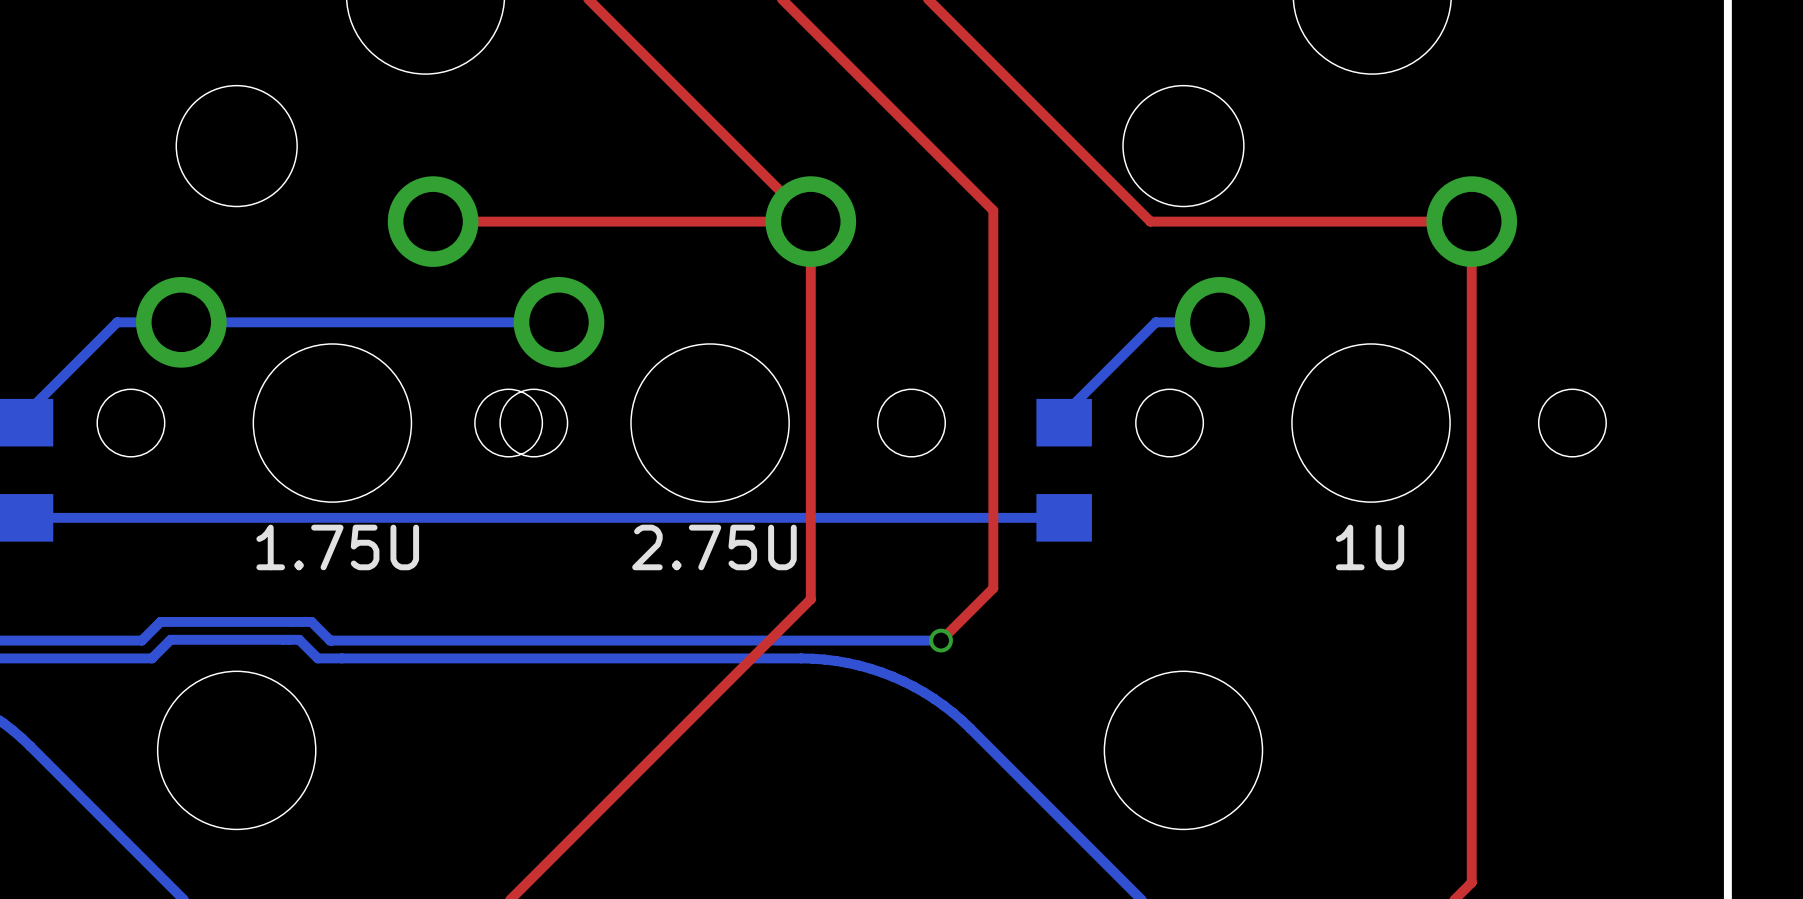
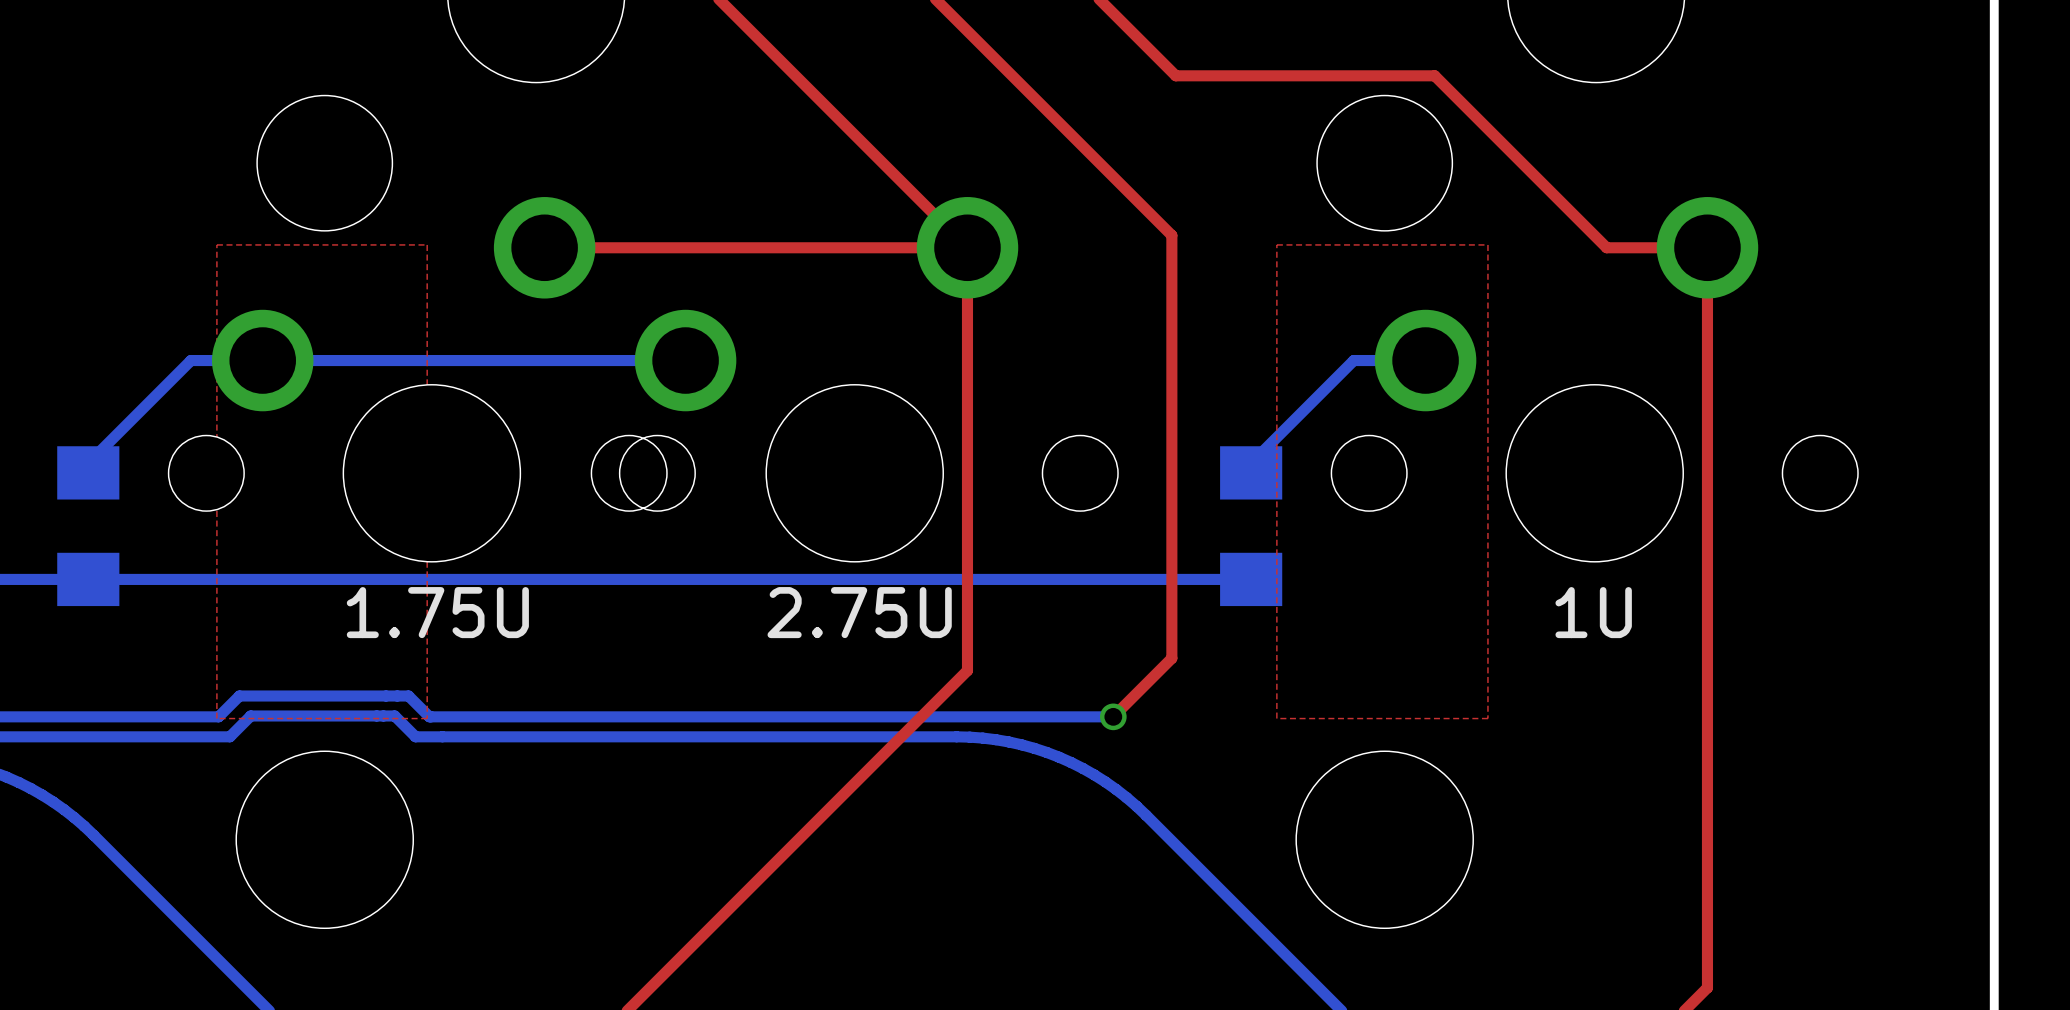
top track: (996, 68) (1150, 221) (1381, 221) -> (1175, 75) (1434, 75) (1606, 247)
top zone outline: none -> (216, 244) (216, 718) (427, 718) (427, 244) (216, 244)
top zone outline: none -> (1276, 244) (1487, 244) (1487, 718) (1276, 718) (1276, 244)

